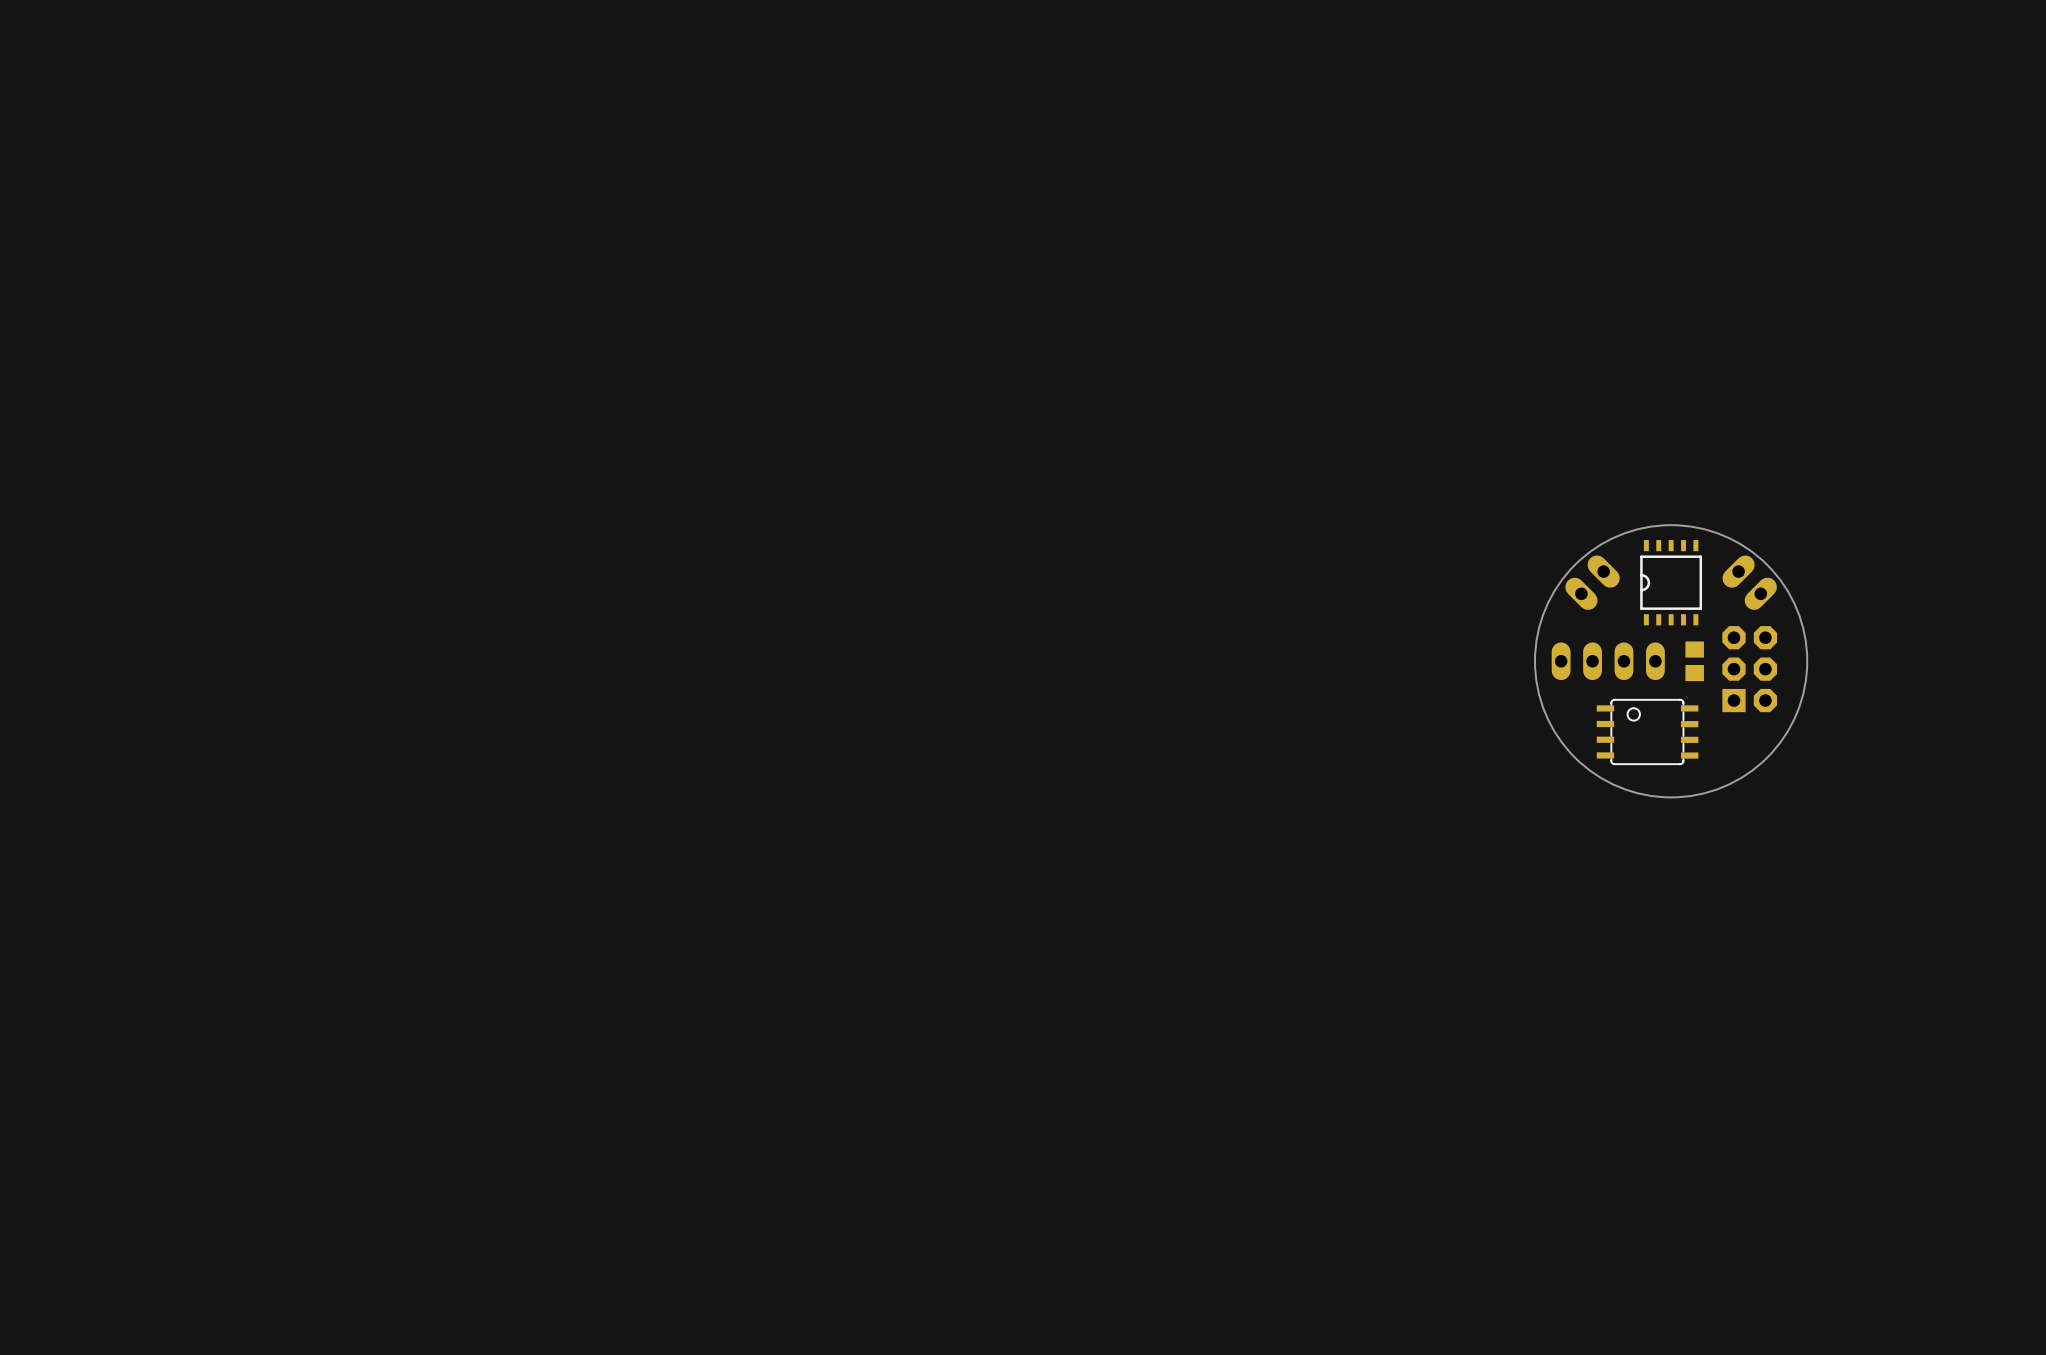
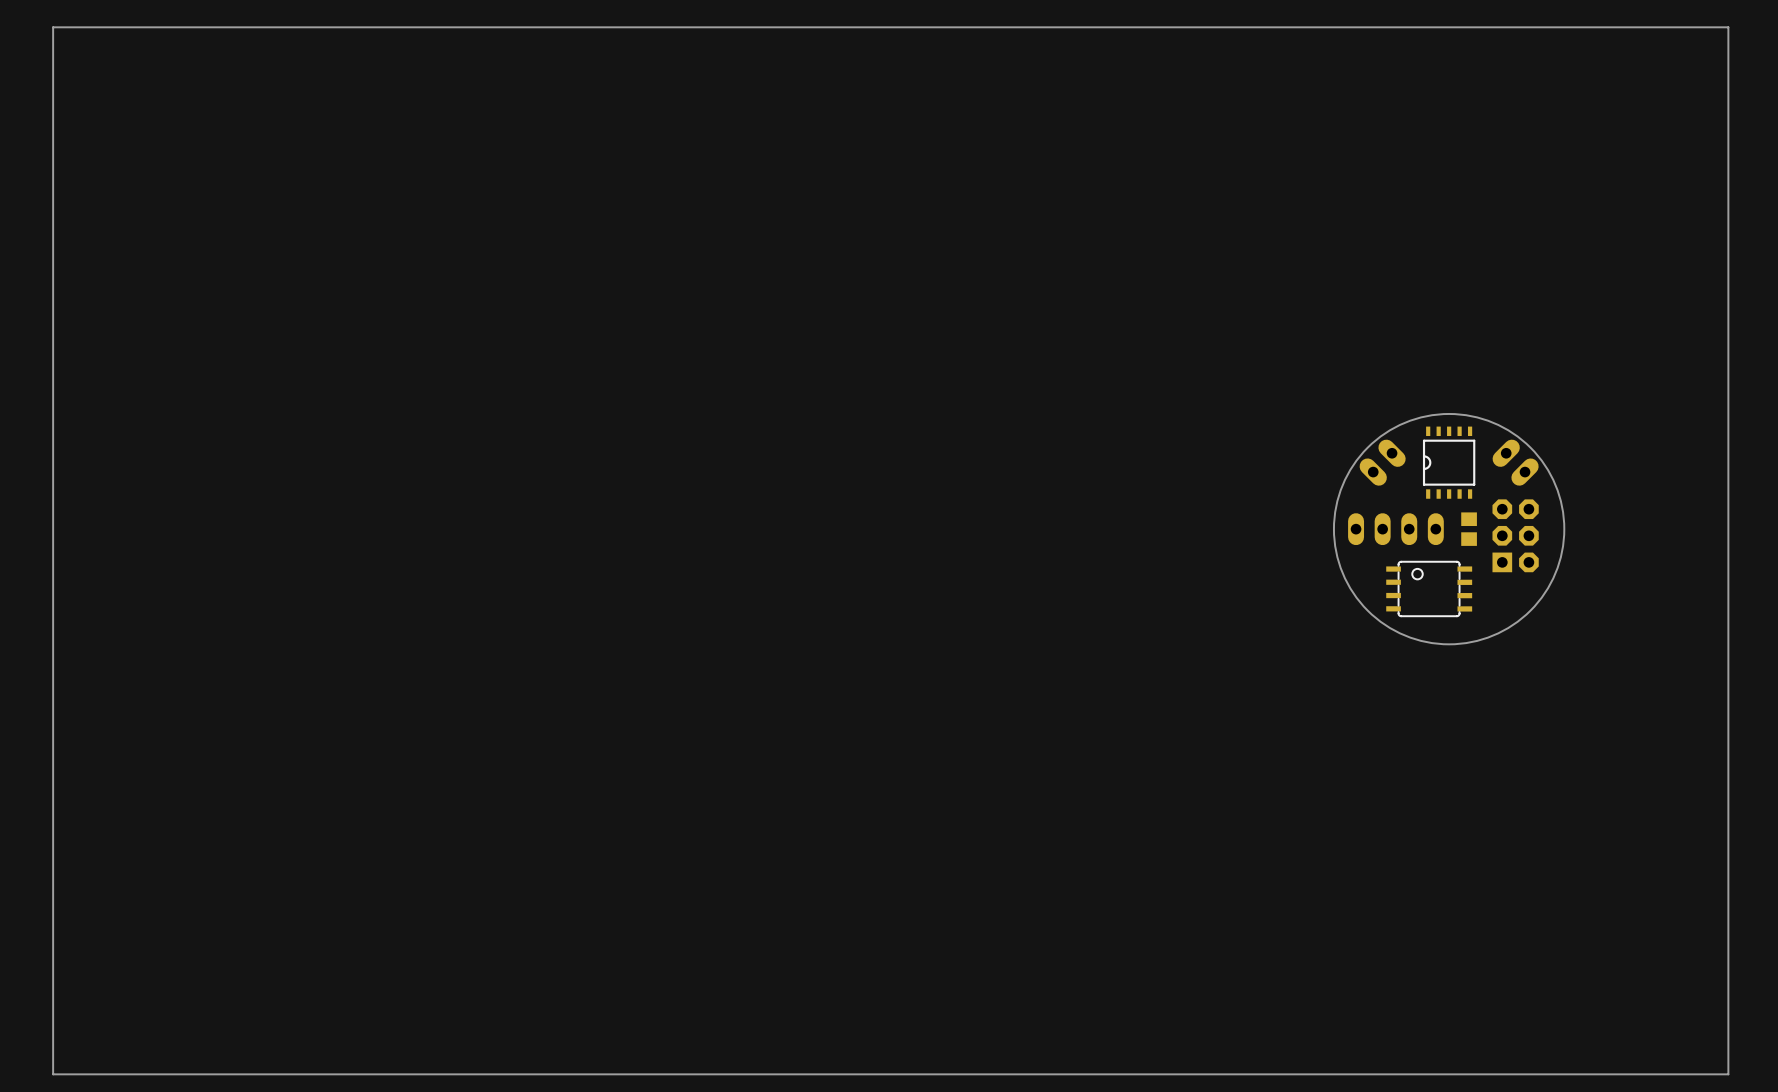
board edge: none -> (1728, 27) (53, 27) (53, 1074) (1728, 1074) (1728, 27)

